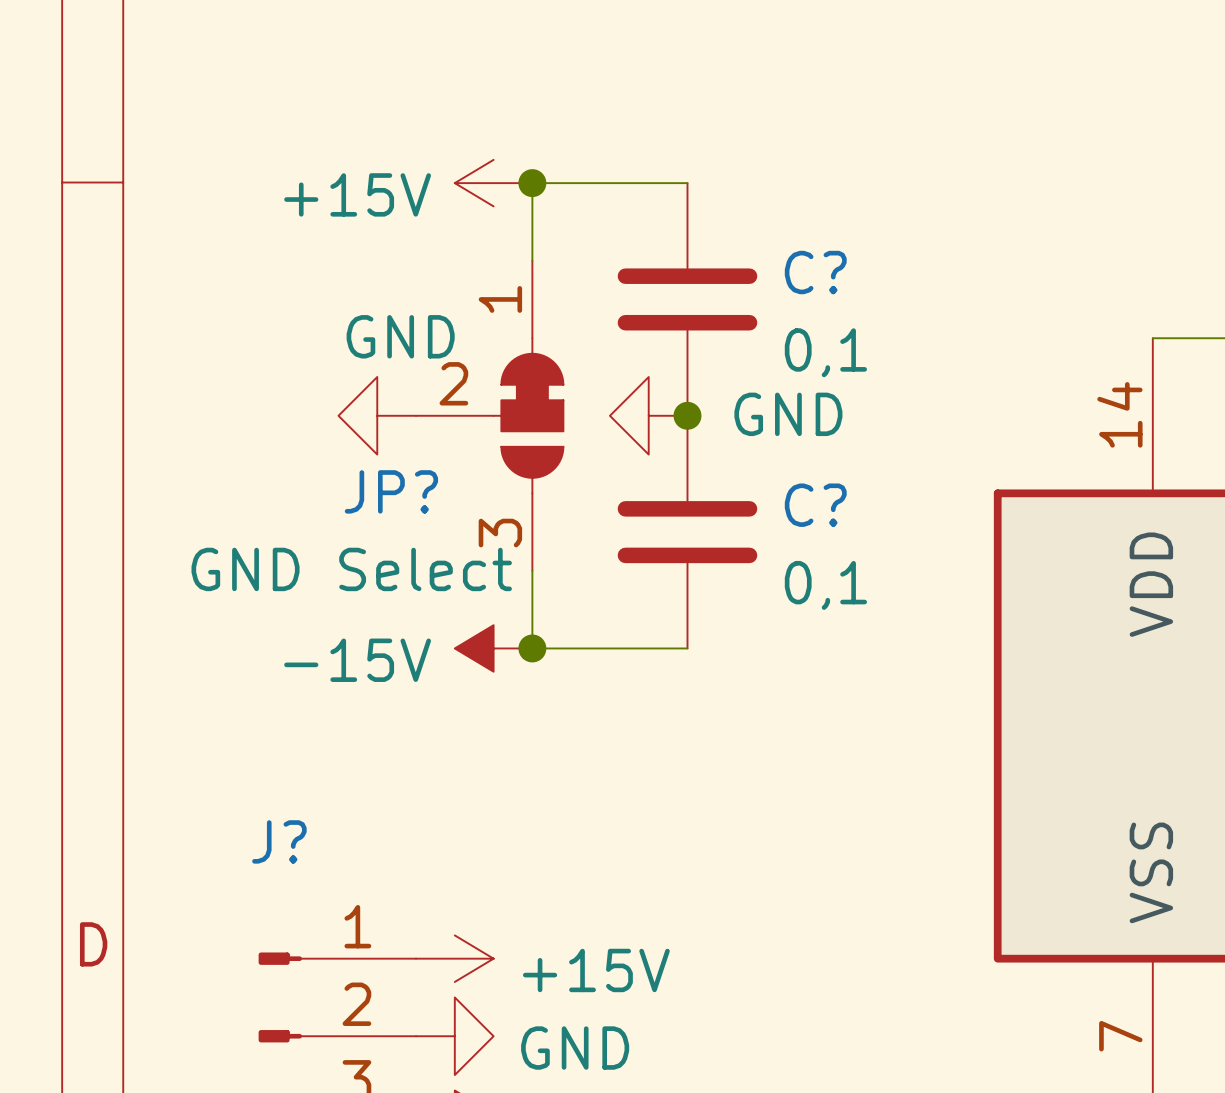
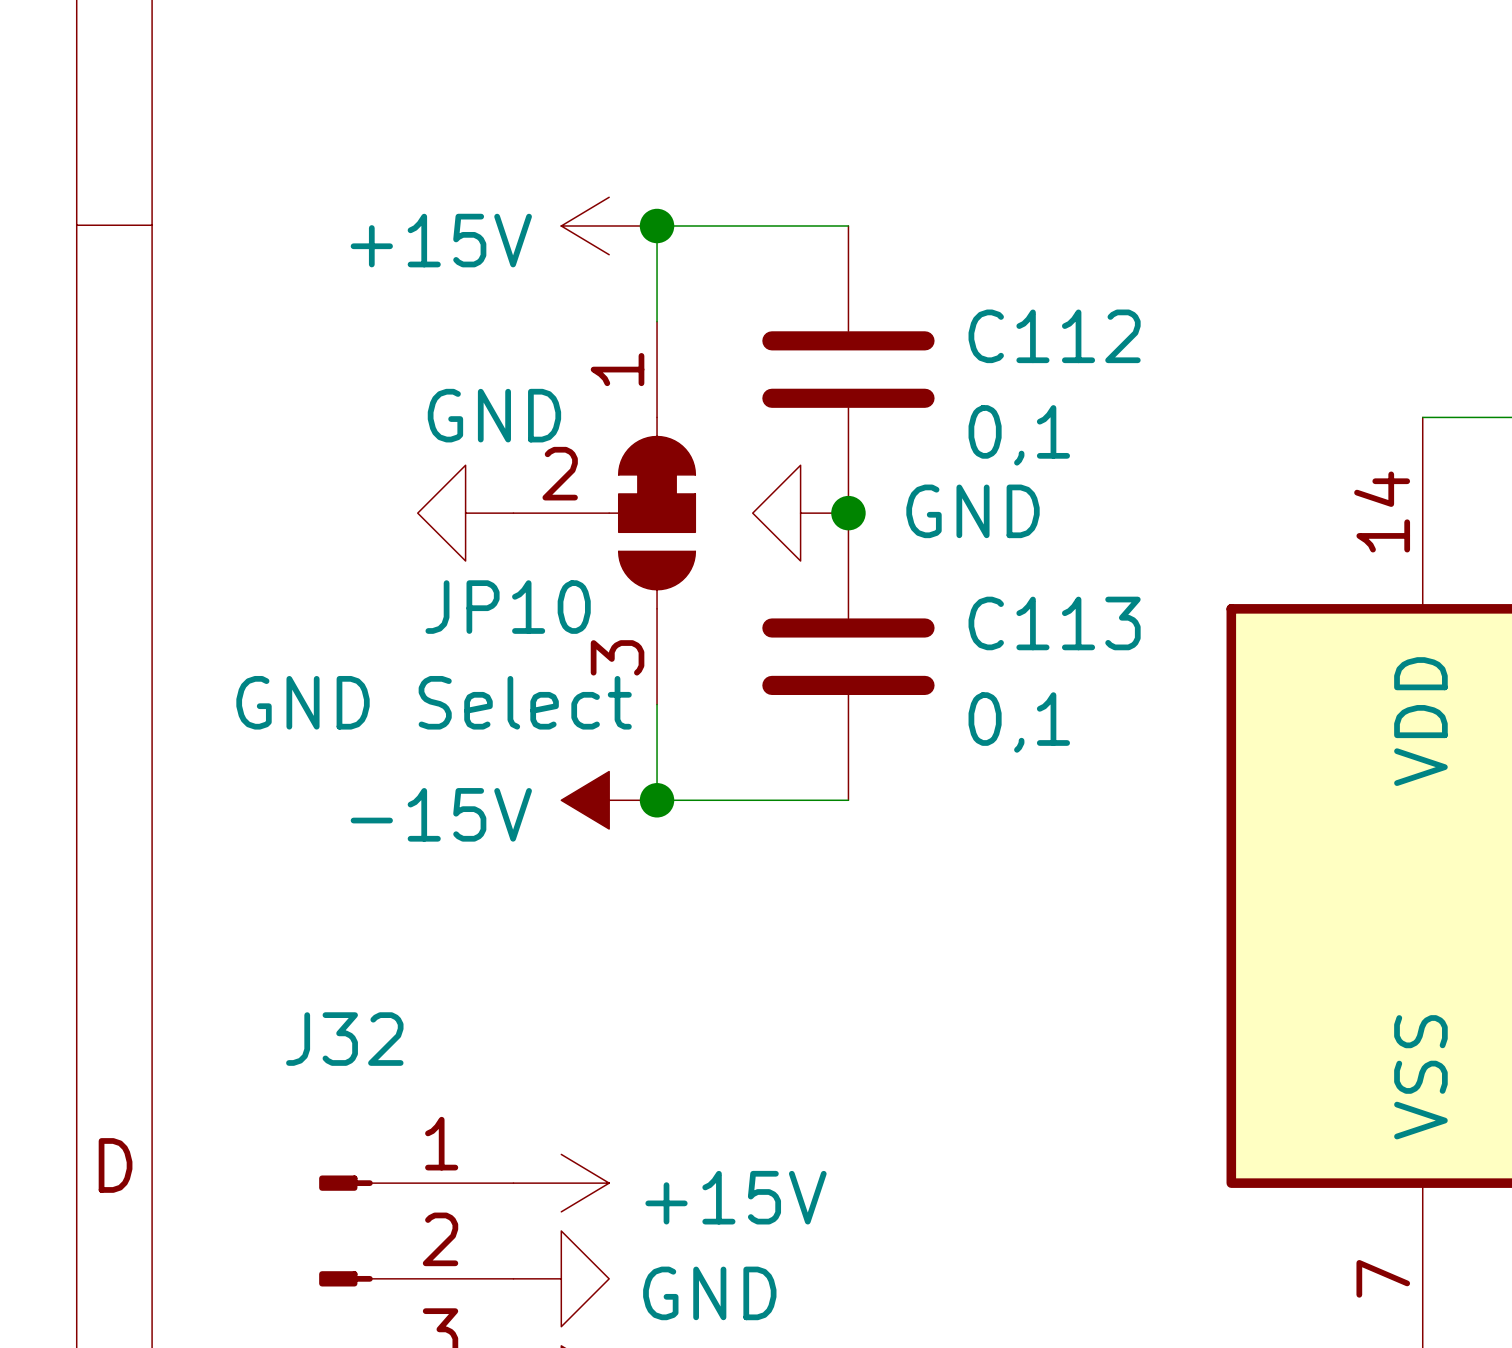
C? name: C? (815, 272) -> C112 (1054, 336)
JP? name: JP? (391, 491) -> JP10 (508, 607)
C? name: C? (815, 505) -> C113 (1054, 623)
J? name: J? (279, 841) -> J32 (344, 1039)

